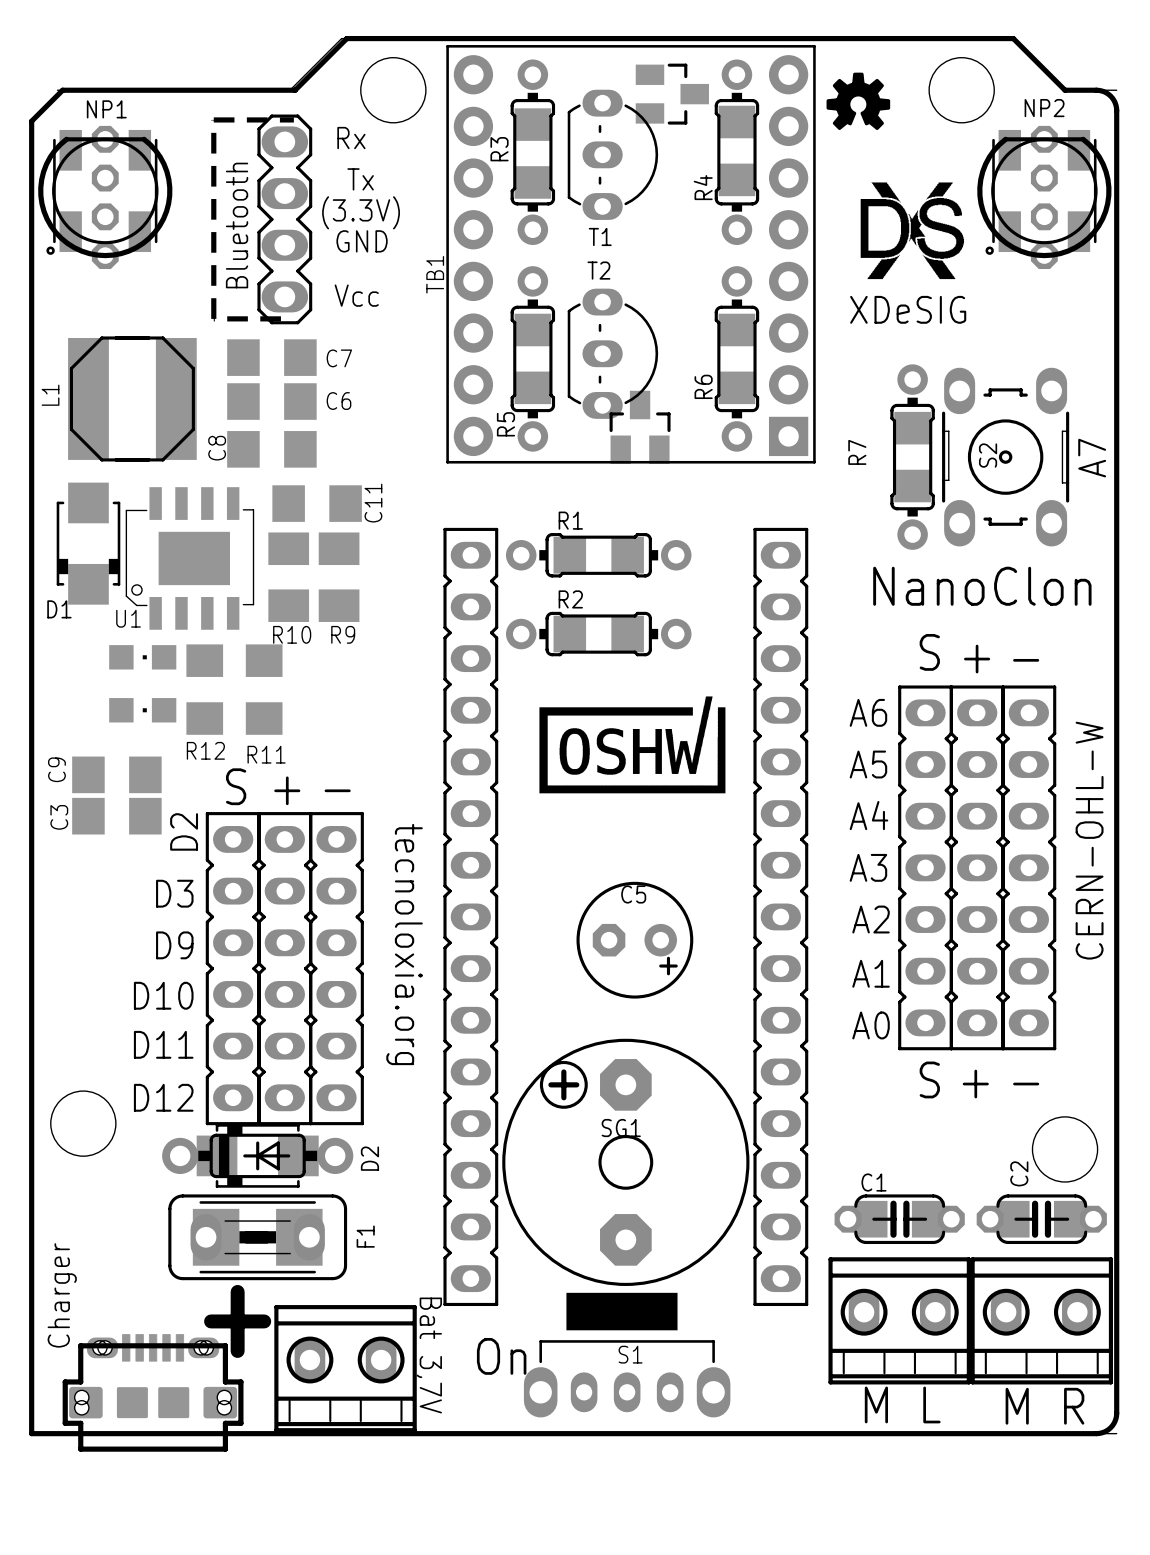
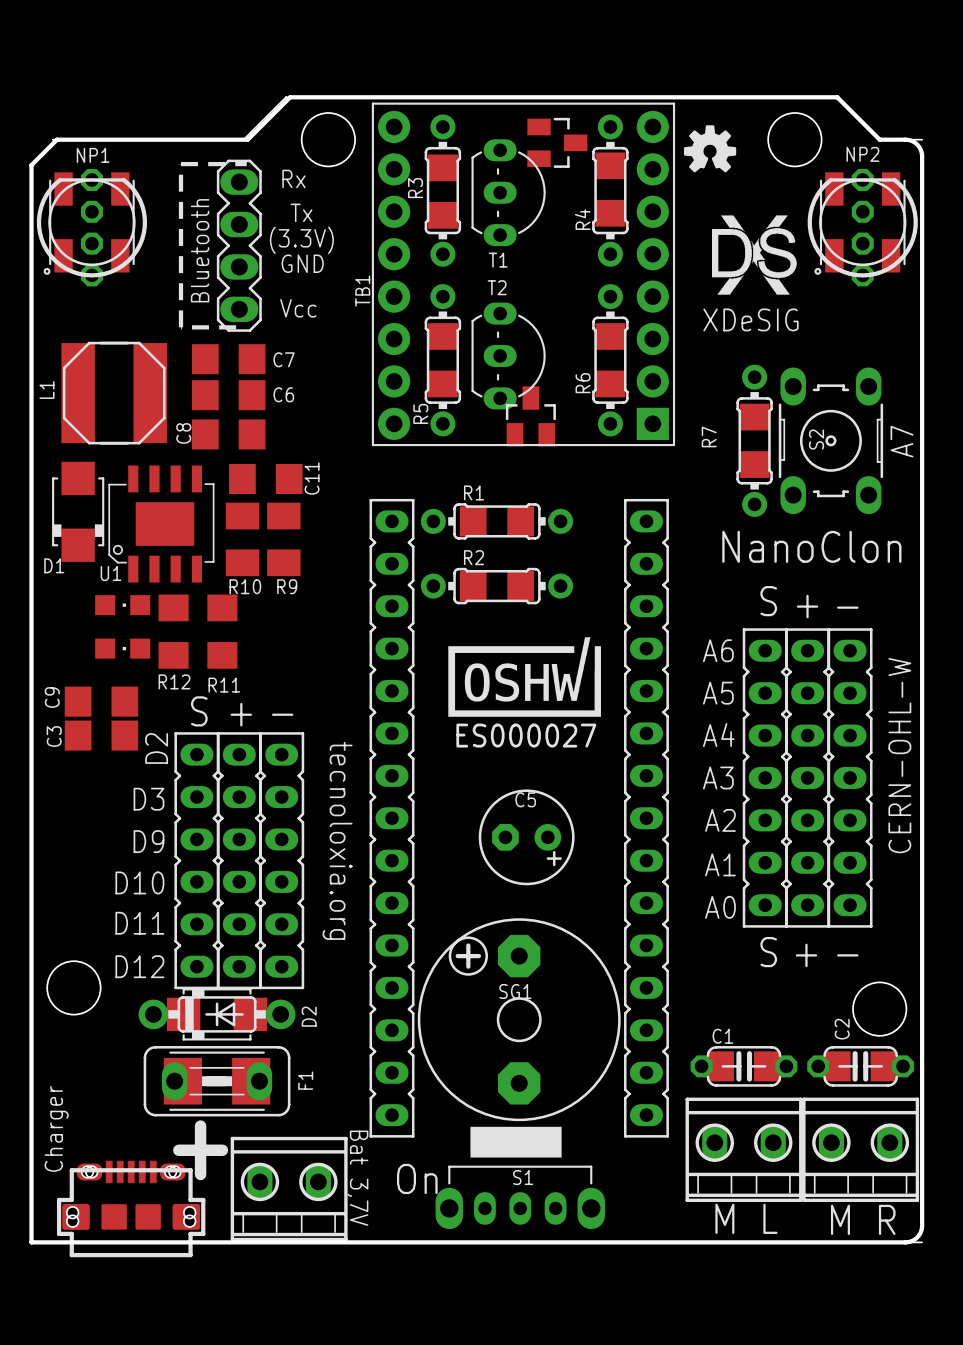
text: none -> ES000027 (526, 735)

